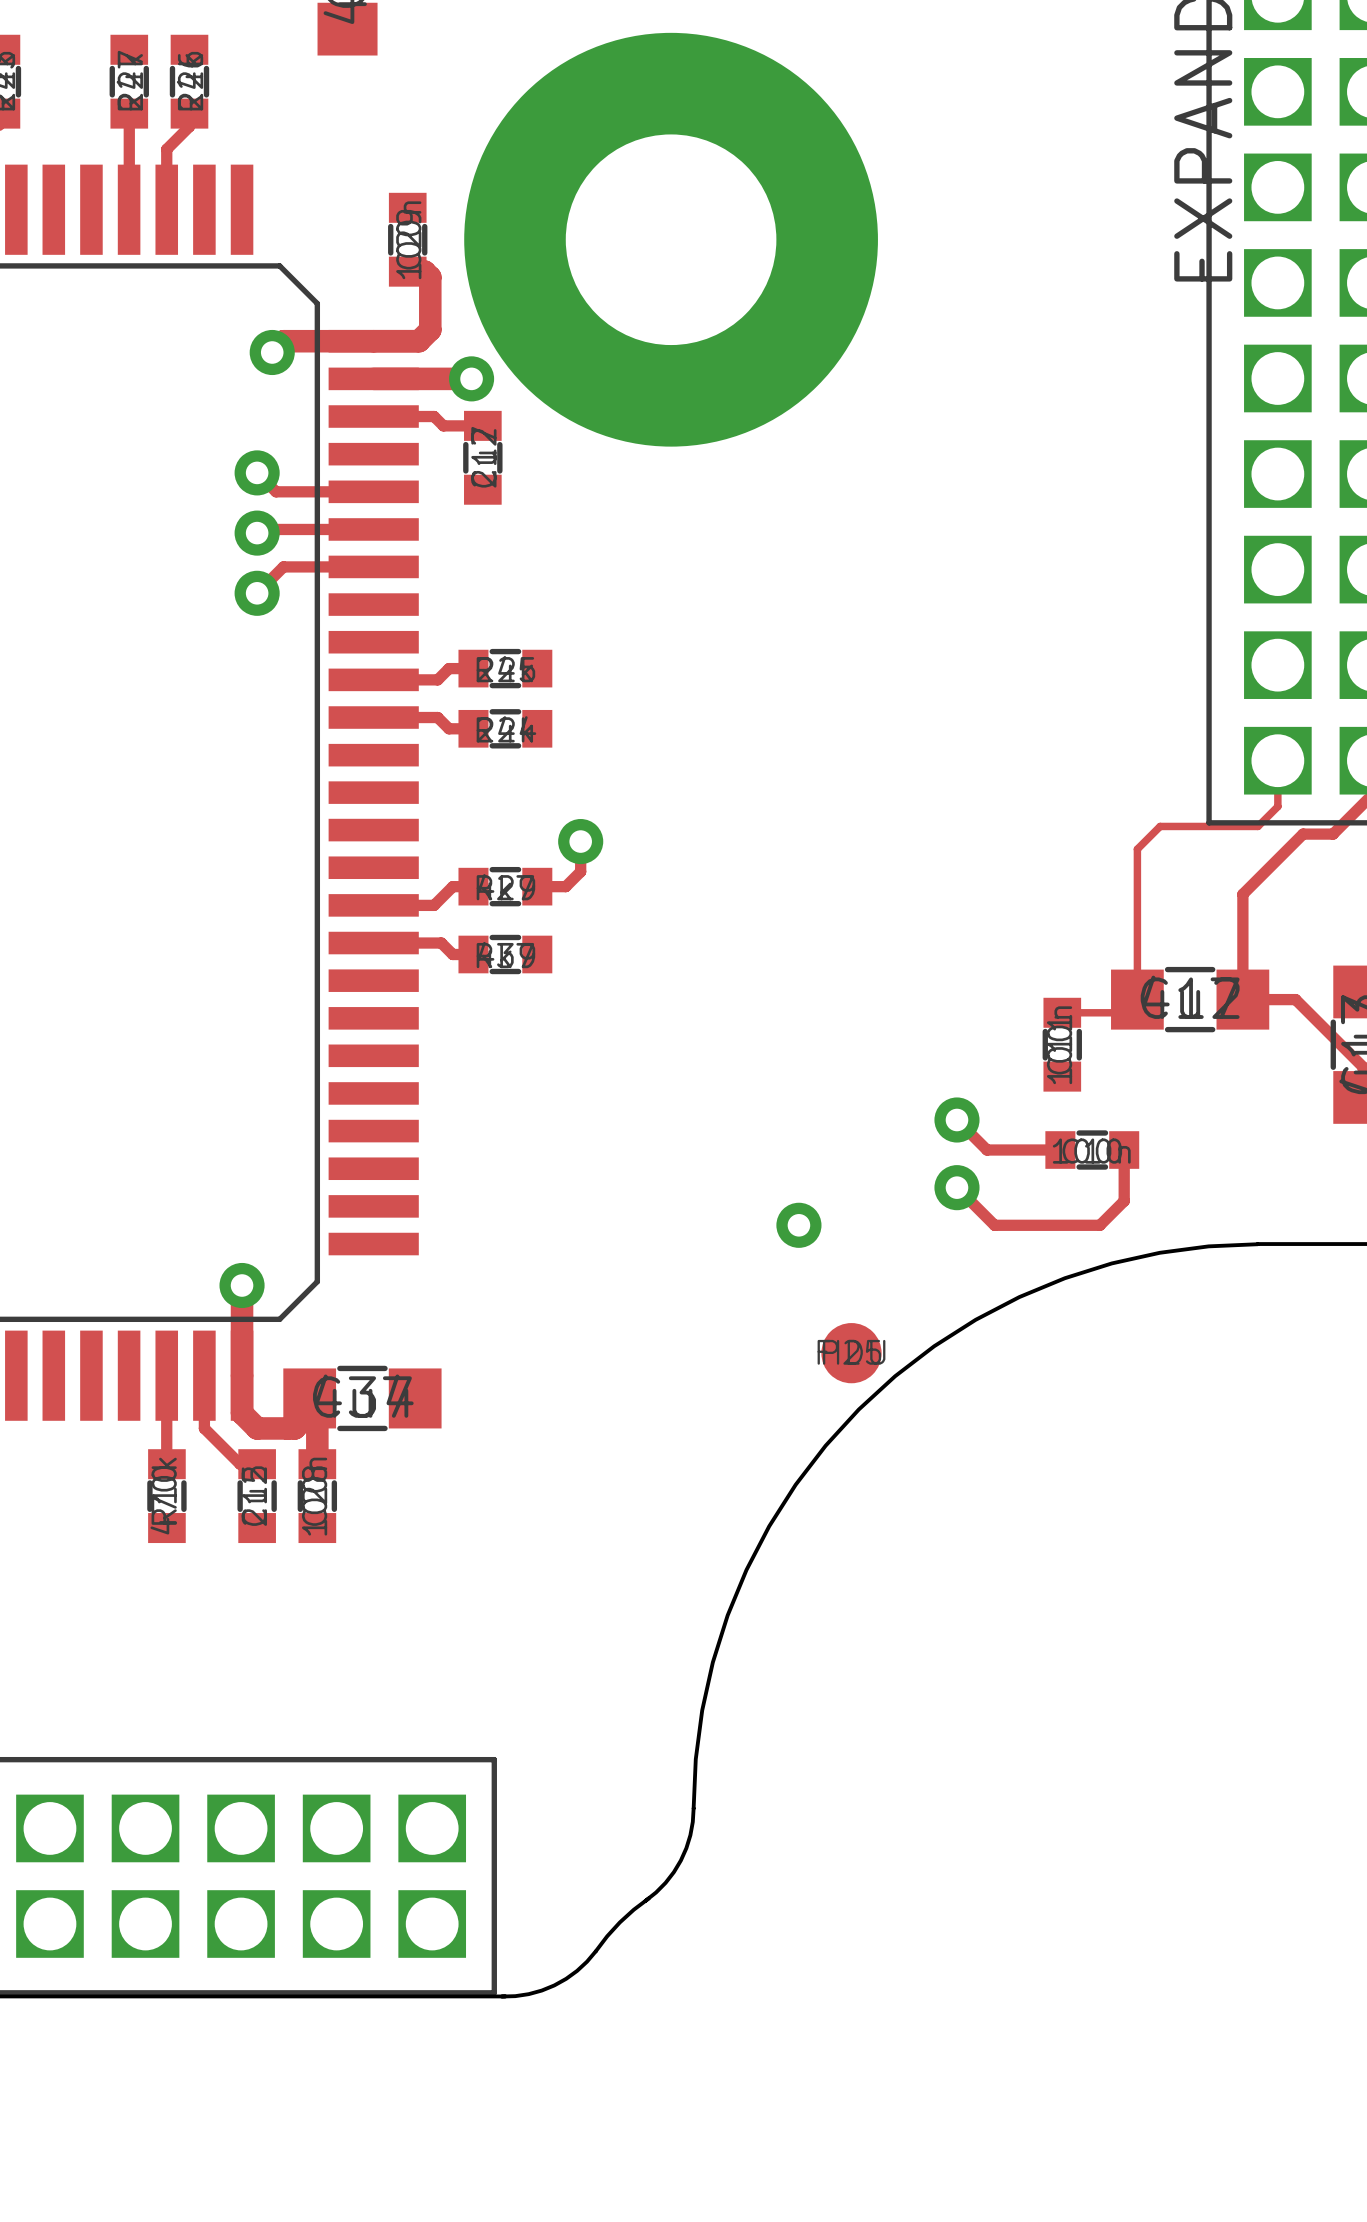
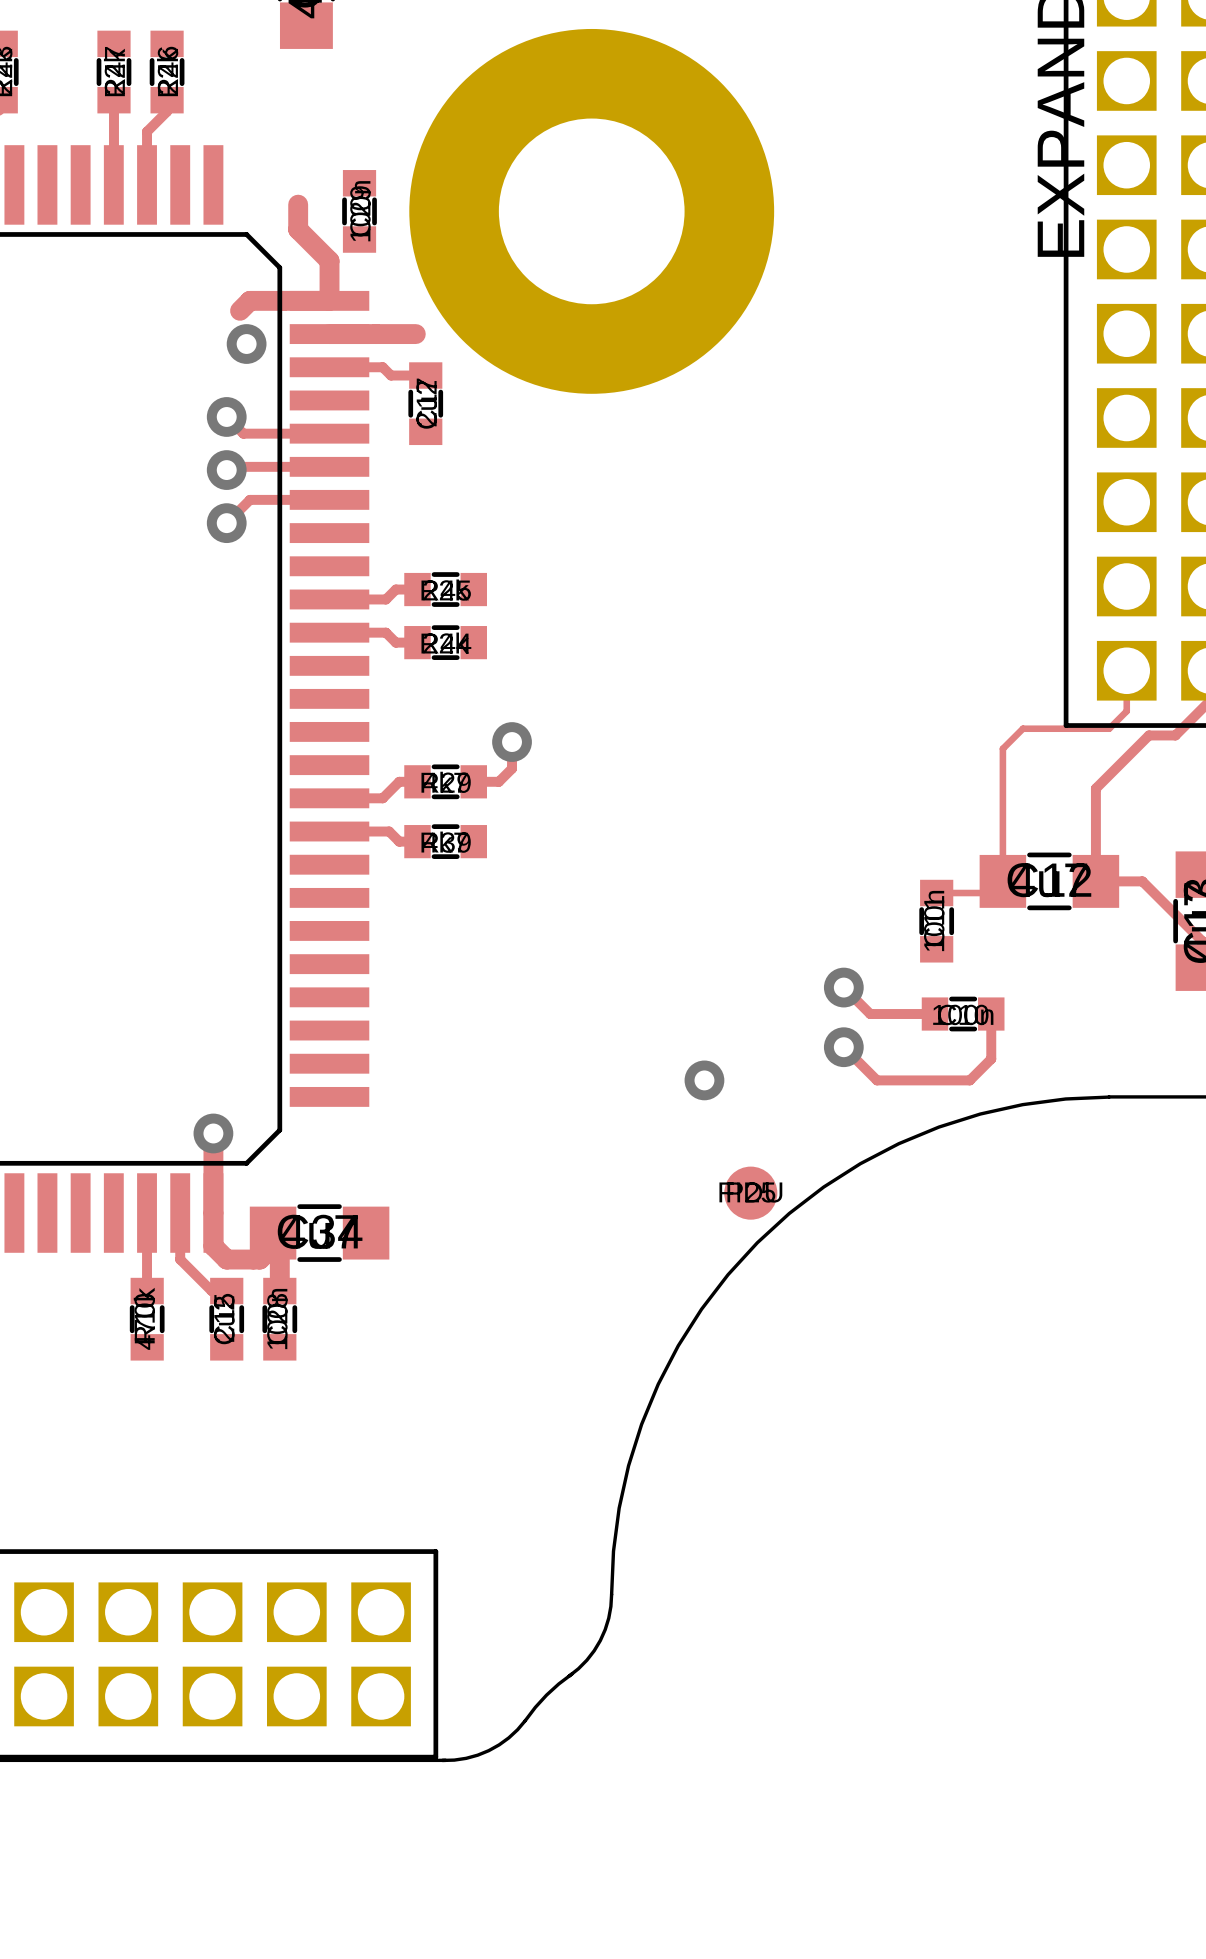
track: (407, 271) (424, 271) (430, 277) (430, 329) (419, 341) (373, 341) -> (298, 204) (298, 229) (329, 260) (329, 300)
via position: (272, 352) -> (246, 344)
via: (471, 378) -> none

